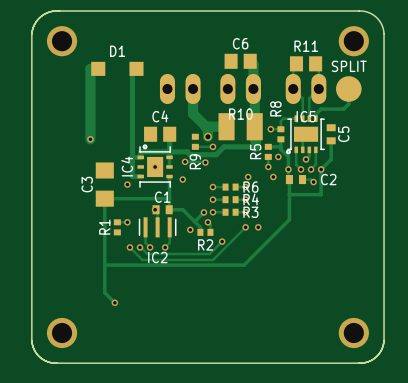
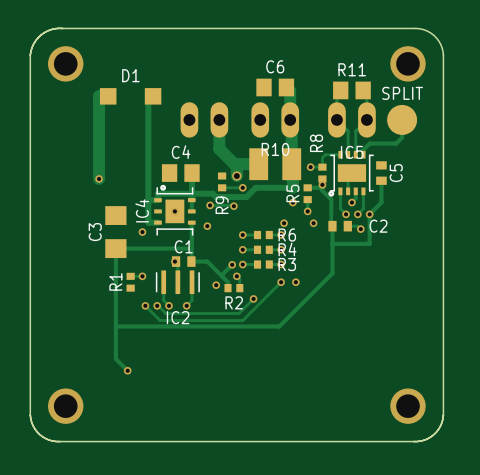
via: none -> (322, 184)
via: (278, 156) -> none
via: none -> (292, 202)
via: (288, 169) -> none

